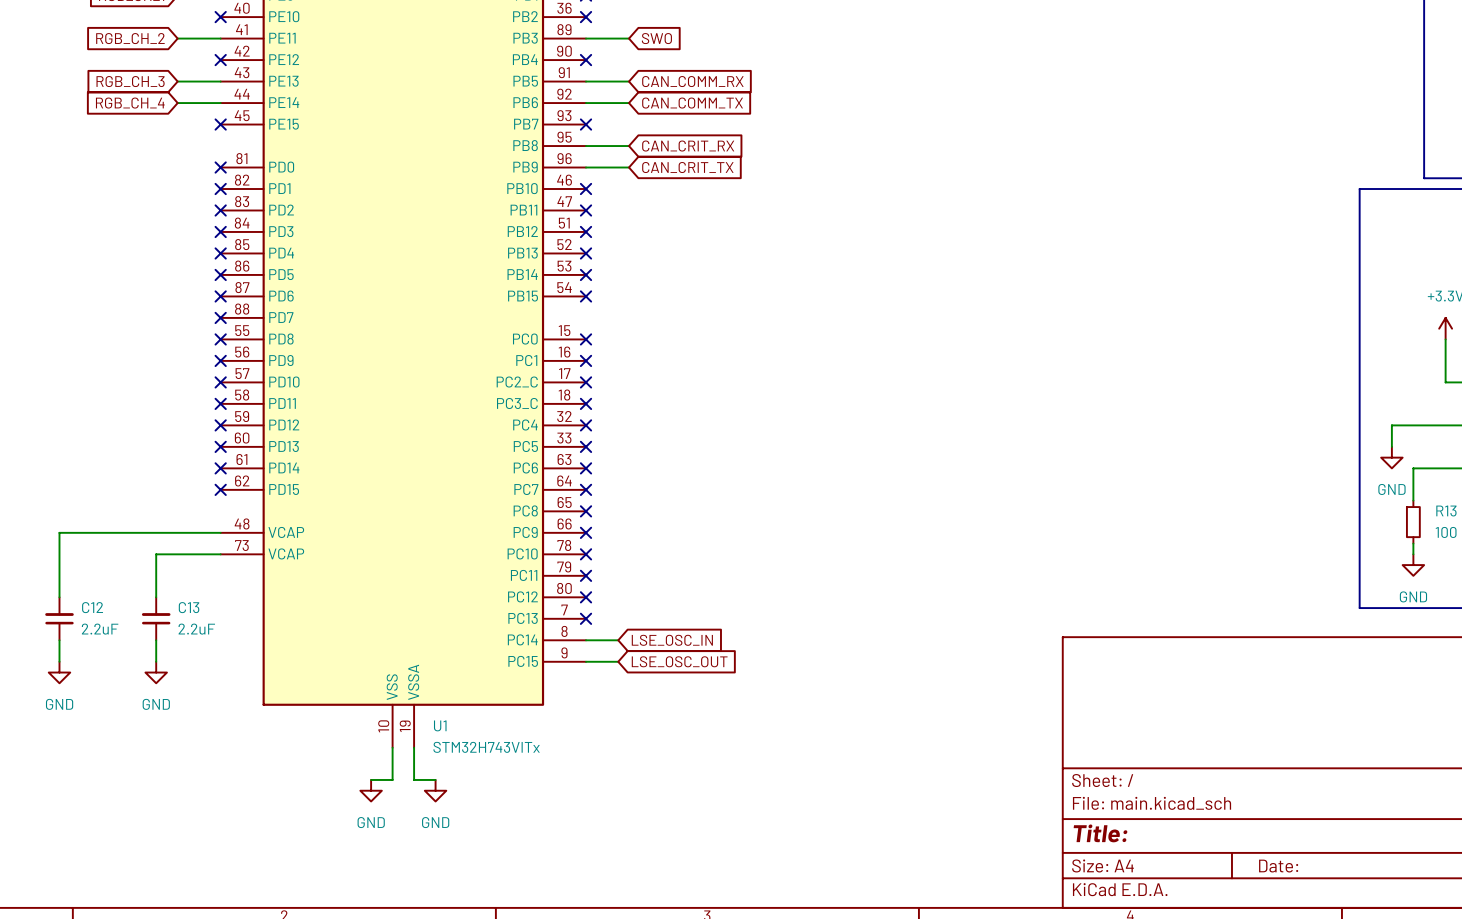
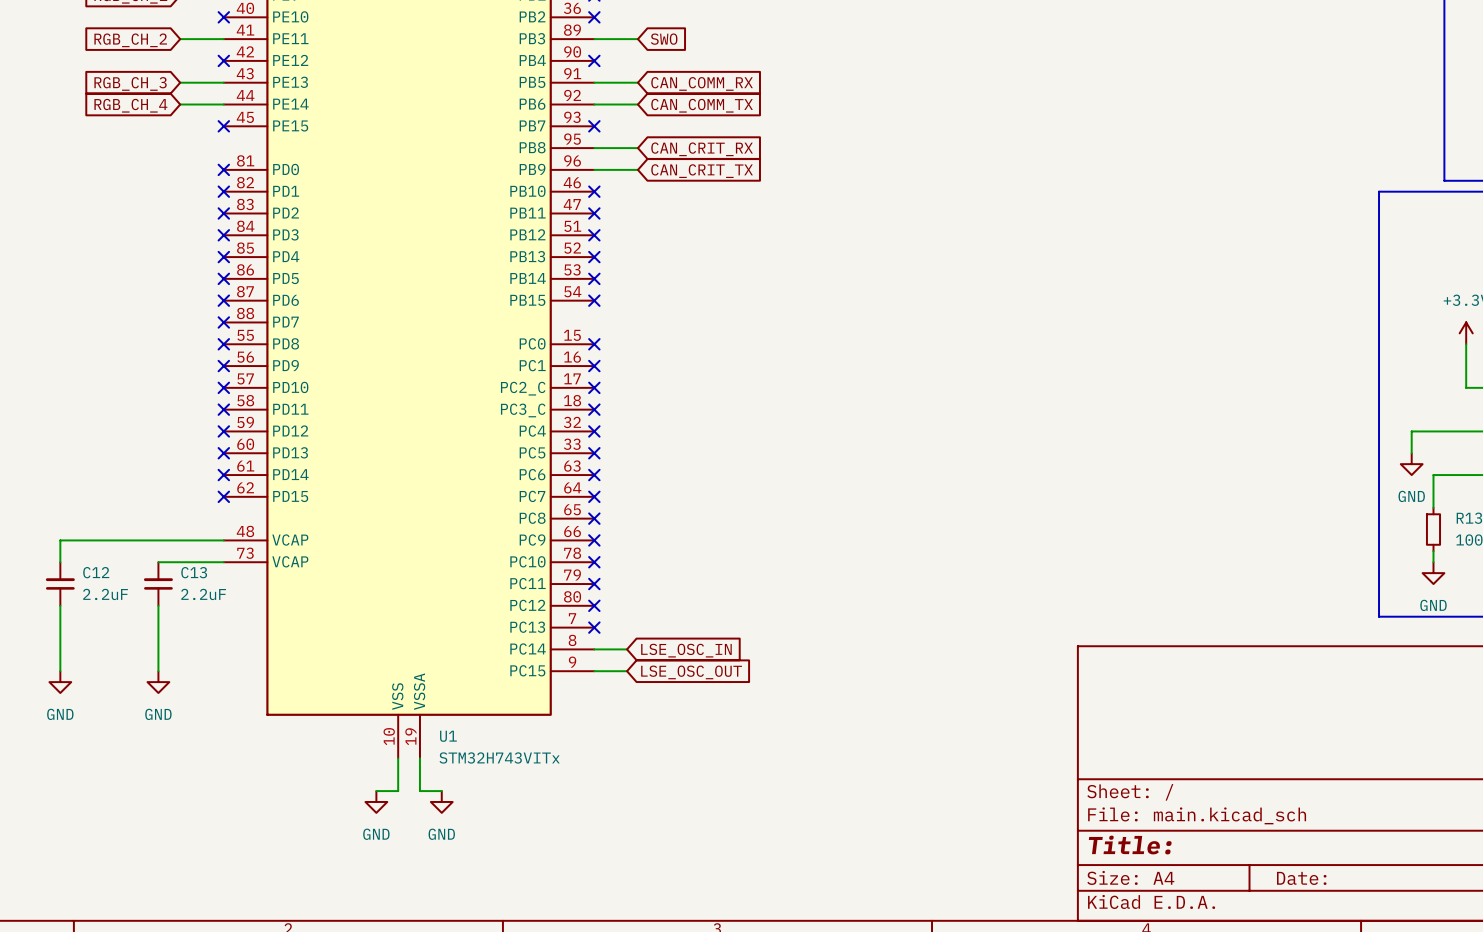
C12 position: (59, 618) -> (60, 584)
C13 position: (156, 618) -> (158, 584)

